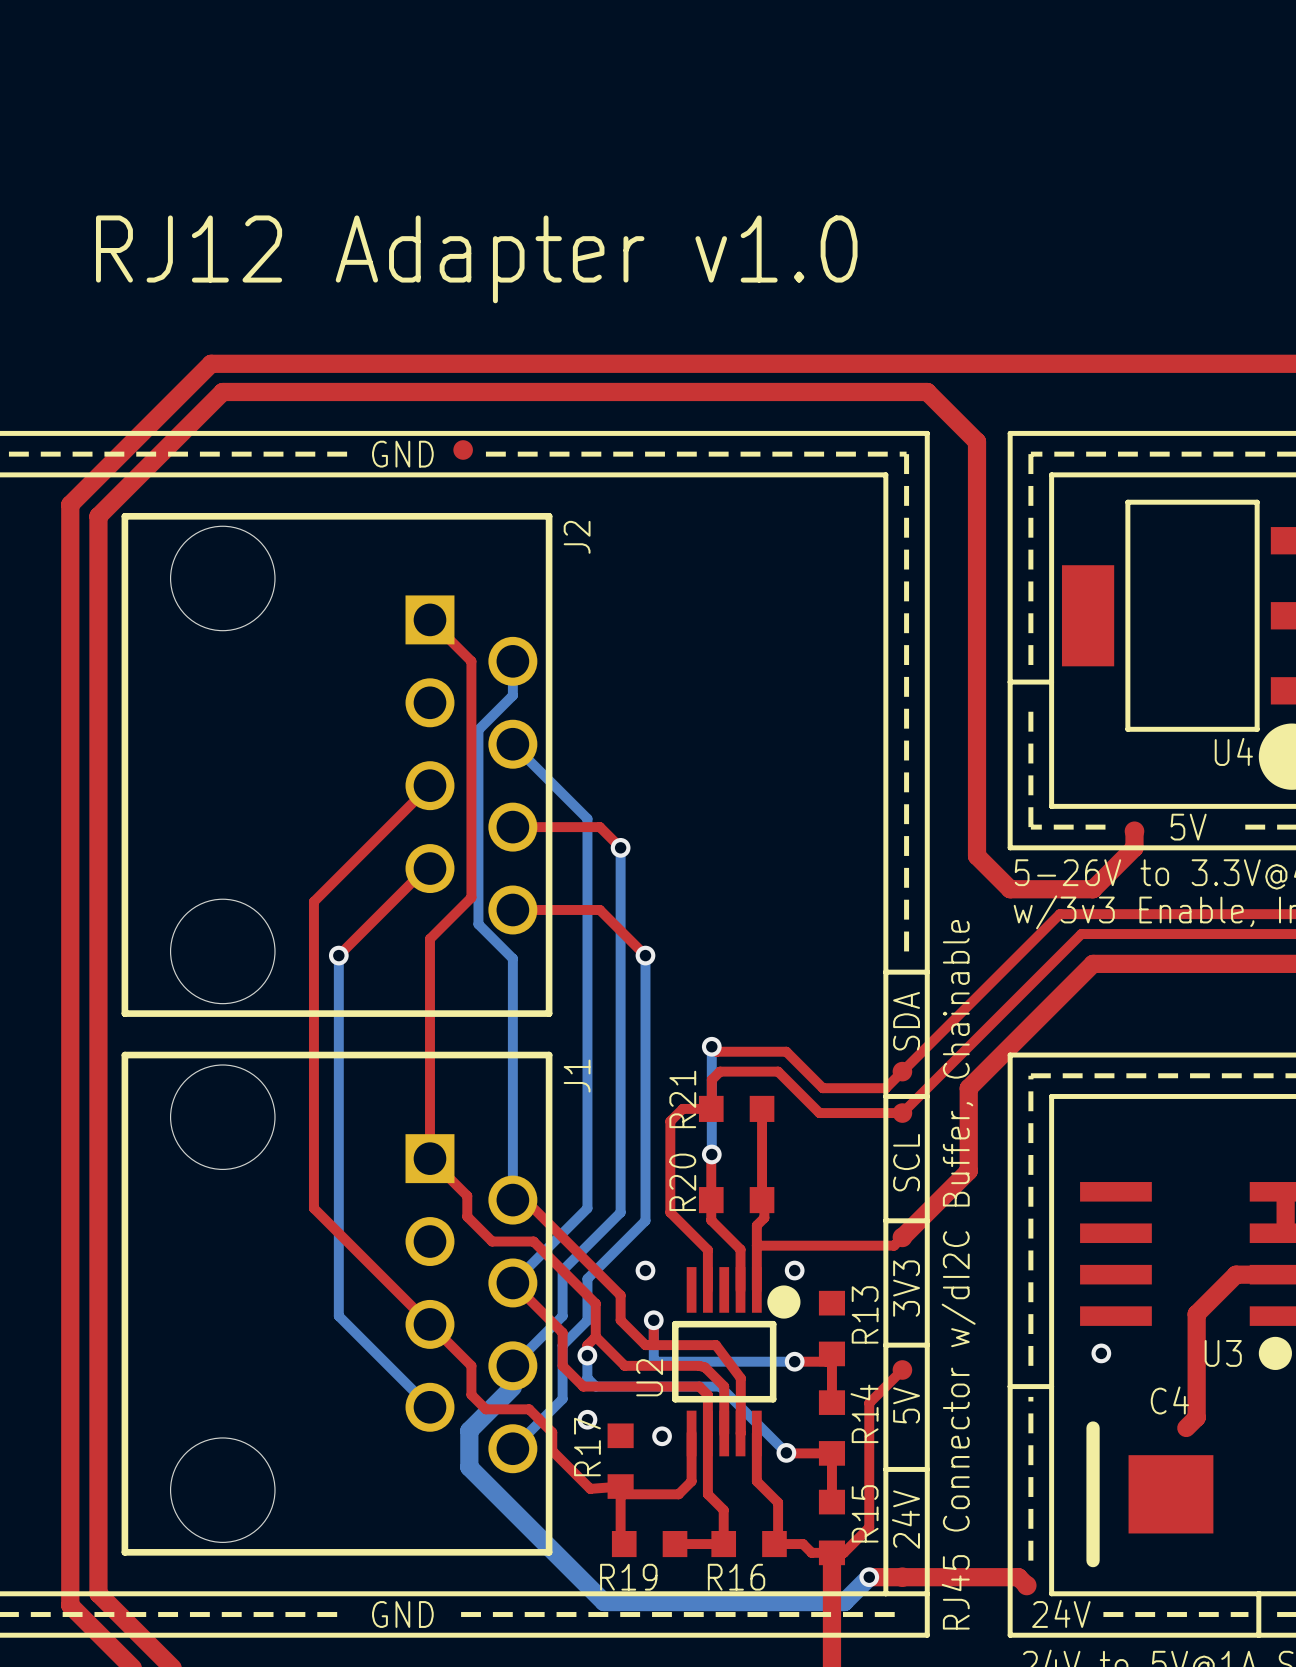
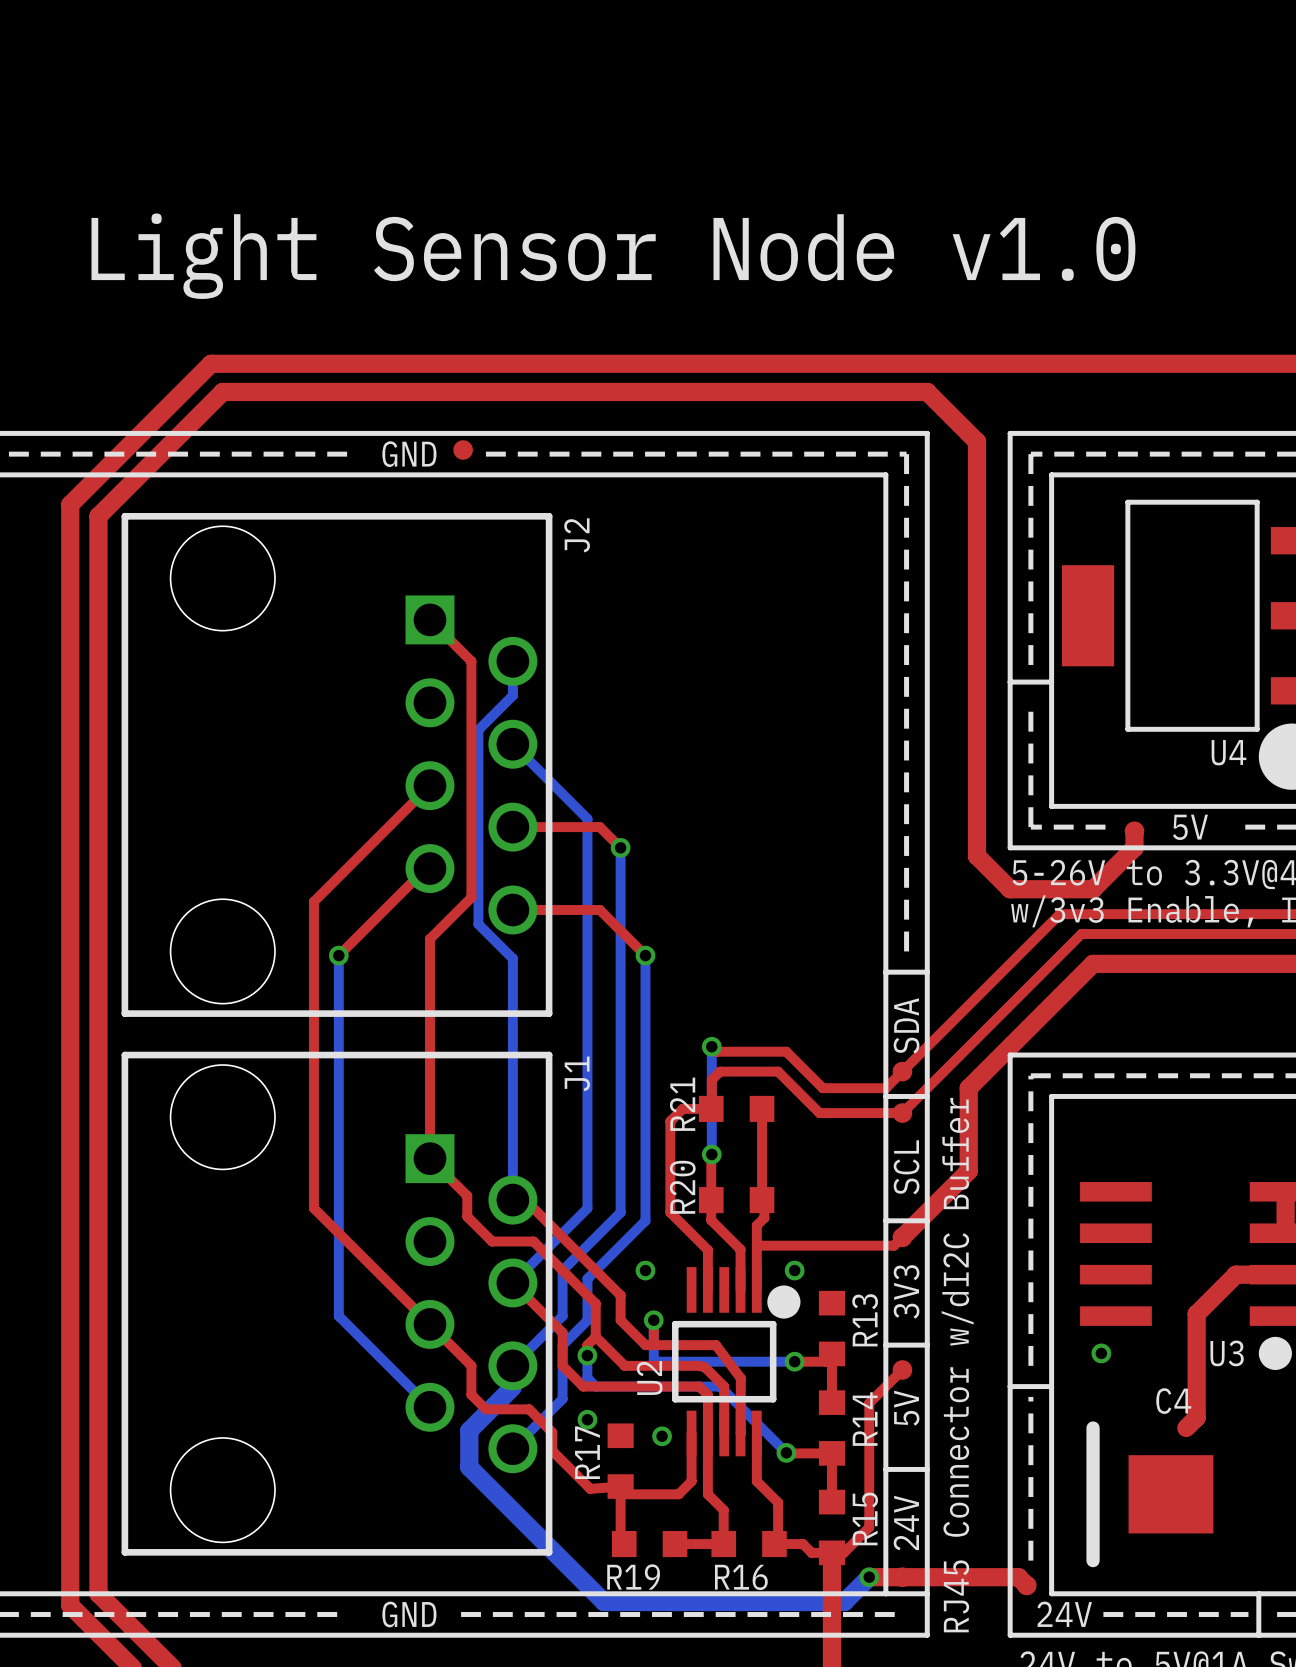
text: RJ12 Adapter v1.0 (476, 259) -> Light Sensor Node v1.0 (613, 256)
text: RJ45 Connector w/dI2C Buffer, Chainable (958, 1274) -> RJ45 Connector w/dI2C Buffer (957, 1365)

